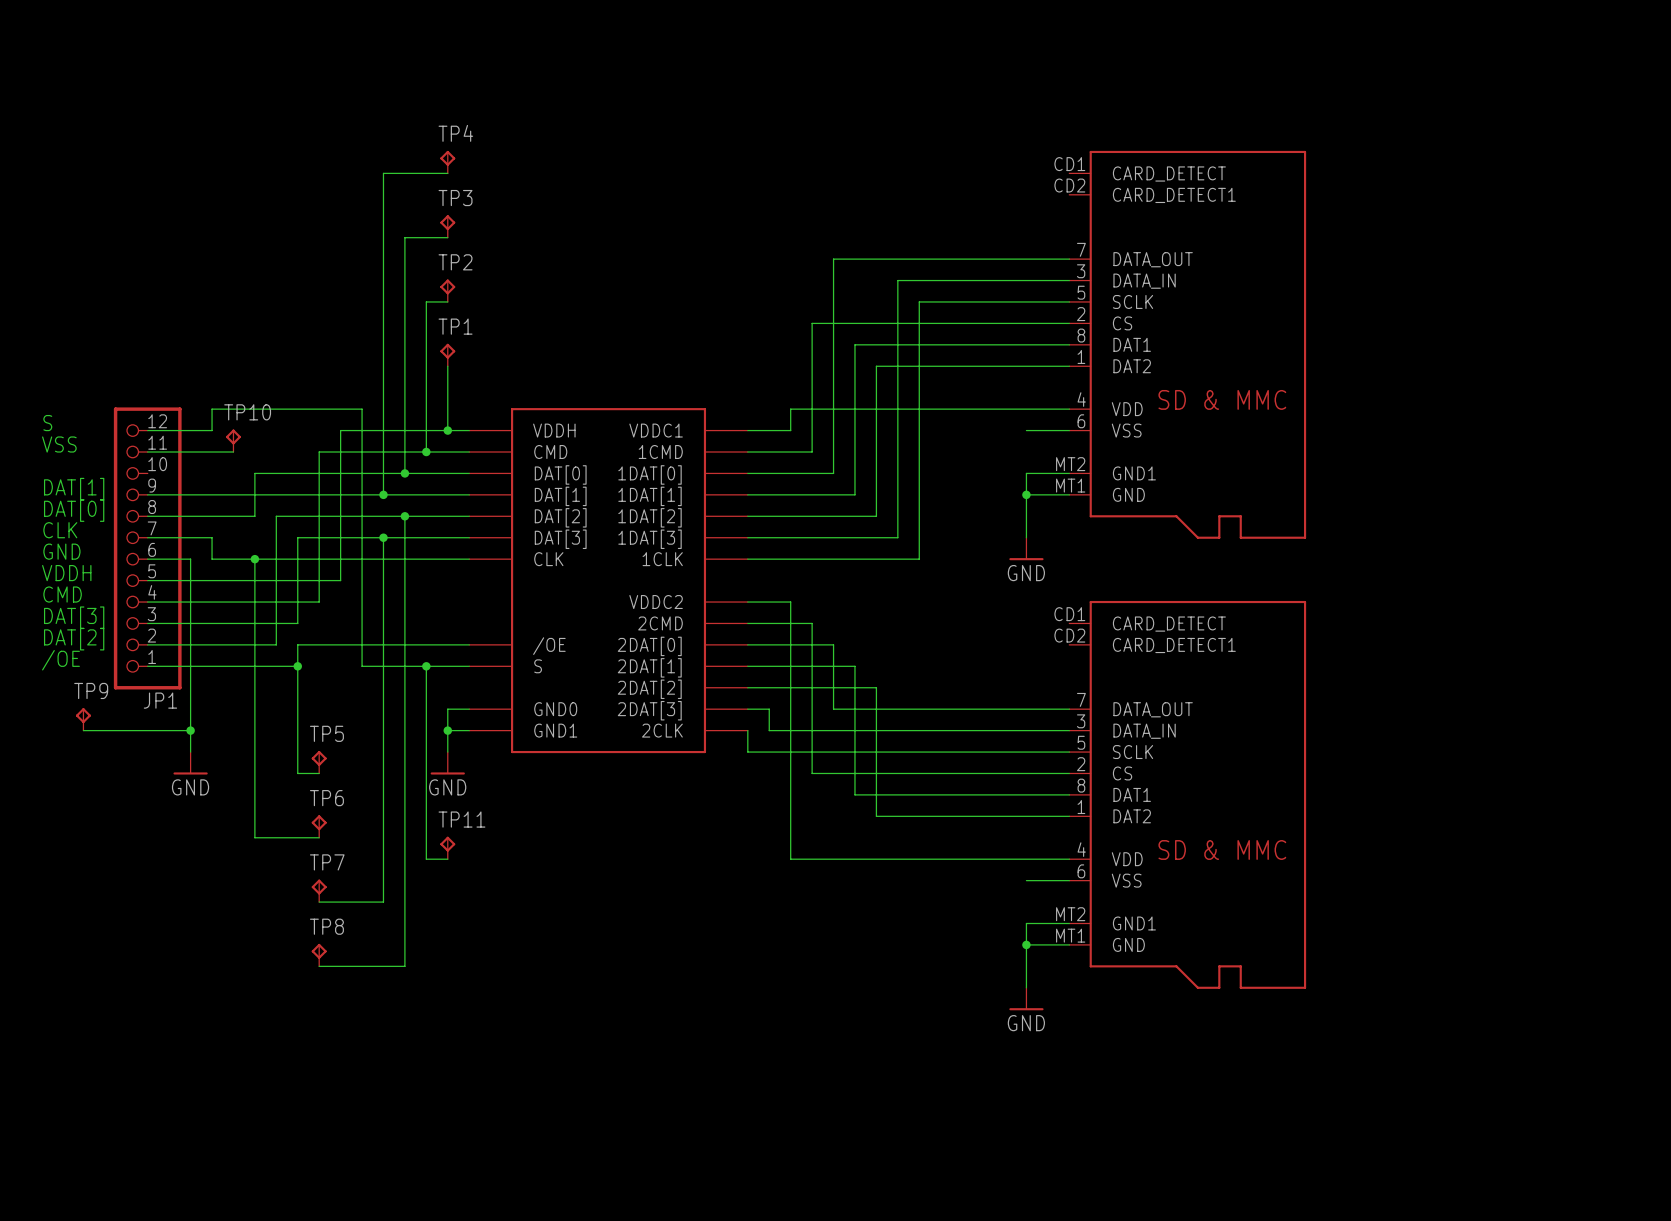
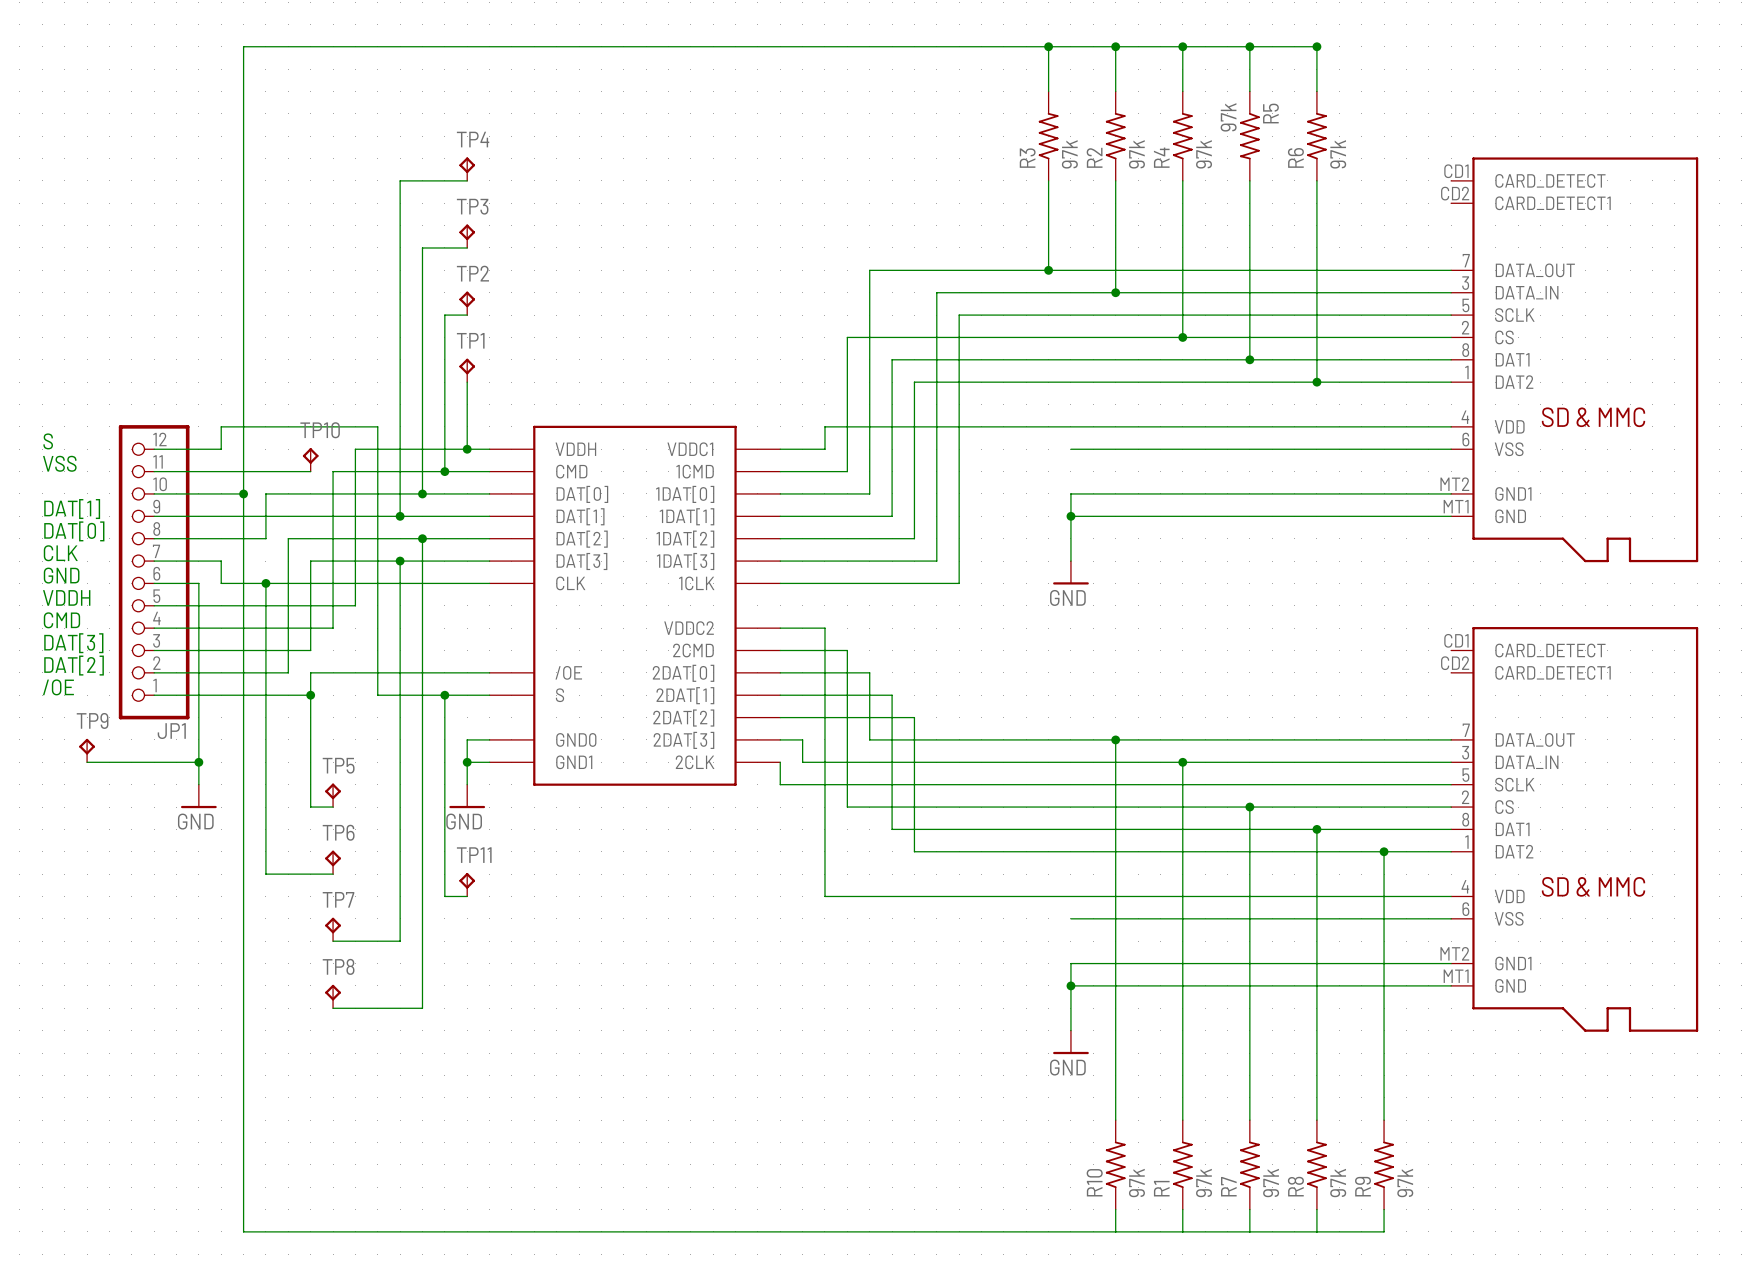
wire: none -> (1048, 46) (1048, 91)
junction: none -> (1048, 46)
wire: none -> (1115, 46) (1115, 91)
junction: none -> (1115, 46)
wire: none -> (1182, 46) (1182, 91)
junction: none -> (1182, 46)
wire: none -> (1249, 46) (1249, 91)
junction: none -> (1249, 46)
junction: none -> (1316, 46)
wire: none -> (1316, 91) (1316, 46) (243, 46) (243, 1231) (1384, 1231) (1384, 1209)
R3: none -> 97k (1048, 136)
R2: none -> 97k (1115, 136)
R4: none -> 97k (1182, 136)
R5: none -> 97k (1249, 136)
R6: none -> 97k (1316, 136)
wire: none -> (1048, 180) (1048, 270)
wire: none -> (1115, 180) (1115, 292) (1451, 292)
wire: none -> (1182, 180) (1182, 337)
wire: none -> (1249, 180) (1249, 359)
wire: none -> (1316, 180) (1316, 382)
junction: none -> (1048, 270)
wire: none -> (1115, 270) (1451, 270)
junction: none -> (1115, 292)
wire: none -> (1115, 315) (1451, 315)
wire: none -> (1115, 337) (1451, 337)
junction: none -> (1182, 337)
wire: none -> (1115, 359) (1451, 359)
part: (1187, 344) -> none
junction: none -> (1249, 359)
part: none -> (1574, 359)
wire: none -> (1115, 382) (1451, 382)
junction: none -> (1316, 382)
wire: none -> (1115, 426) (1451, 426)
wire: none -> (1115, 449) (1451, 449)
TP10 position: (233, 440) -> (310, 459)
wire: none -> (243, 471) (310, 471)
wire: none -> (154, 493) (243, 493)
junction: none -> (243, 493)
wire: none -> (1115, 493) (1451, 493)
wire: none -> (1115, 516) (1451, 516)
junction: none -> (1115, 739)
wire: none -> (1451, 739) (1115, 739) (1115, 1120)
wire: none -> (1115, 762) (1451, 762)
wire: none -> (1182, 762) (1182, 1120)
junction: none -> (1182, 762)
wire: none -> (1115, 784) (1451, 784)
wire: none -> (1115, 807) (1451, 807)
wire: none -> (1249, 807) (1249, 1120)
junction: none -> (1249, 807)
wire: none -> (1115, 829) (1451, 829)
part: (1187, 794) -> none
wire: none -> (1316, 829) (1316, 1120)
junction: none -> (1316, 829)
part: none -> (1574, 829)
wire: none -> (1115, 851) (1451, 851)
wire: none -> (1384, 851) (1384, 1120)
junction: none -> (1384, 851)
wire: none -> (1115, 896) (1451, 896)
wire: none -> (1115, 918) (1451, 918)
wire: none -> (1115, 963) (1451, 963)
wire: none -> (1115, 985) (1451, 985)
R10: none -> 97k (1115, 1164)
R1: none -> 97k (1182, 1164)
R7: none -> 97k (1249, 1164)
R8: none -> 97k (1316, 1164)
R9: none -> 97k (1384, 1164)
wire: none -> (1115, 1209) (1115, 1231)
wire: none -> (1182, 1209) (1182, 1231)
wire: none -> (1249, 1209) (1249, 1231)
wire: none -> (1316, 1209) (1316, 1231)

